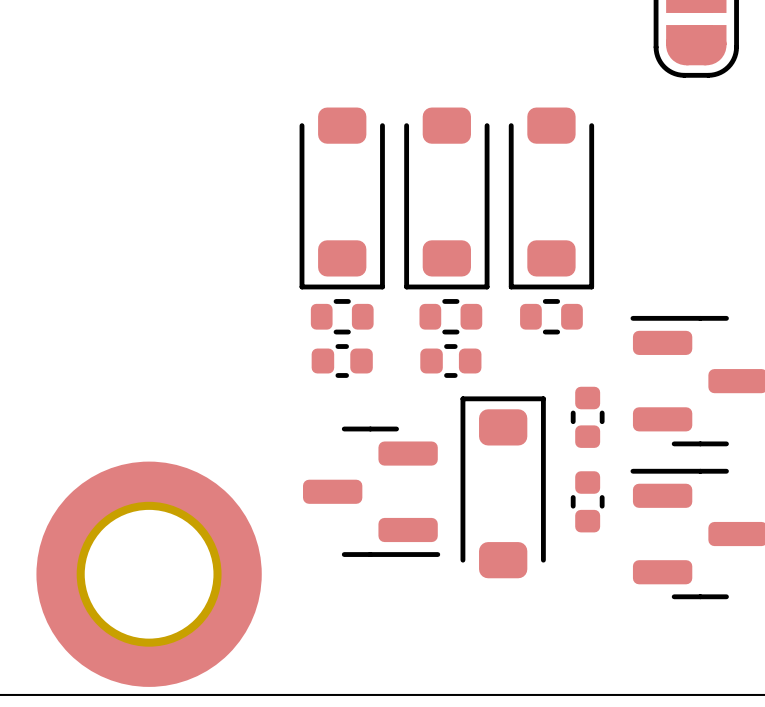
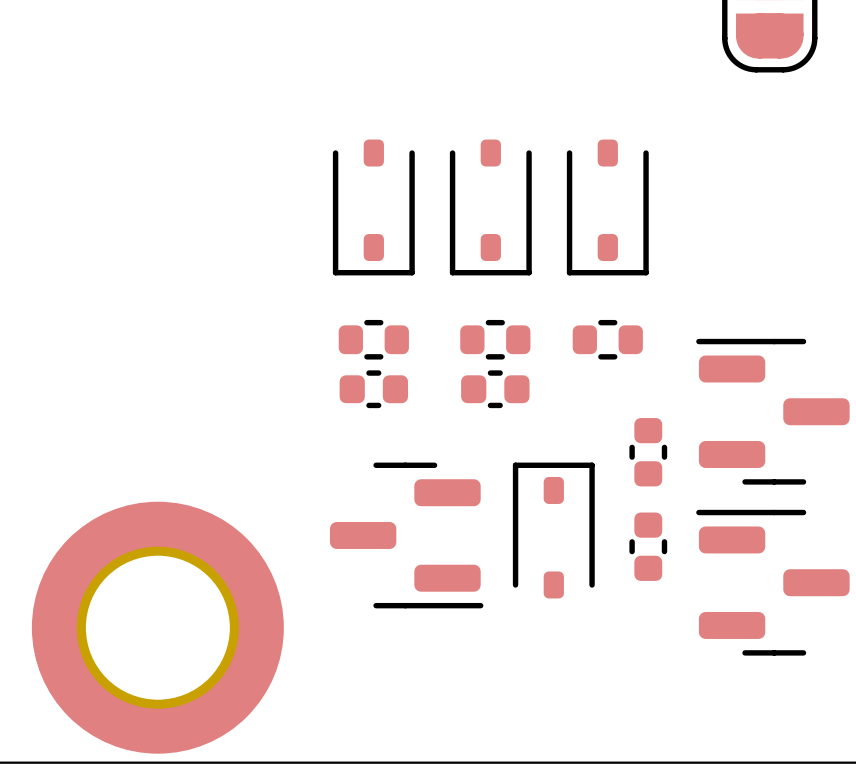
part footprint: [299, 107, 385, 290] -> [332, 139, 415, 276]
part footprint: [404, 107, 490, 290] -> [449, 139, 532, 276]
part footprint: [508, 107, 595, 290] -> [566, 139, 649, 276]
part footprint: [460, 396, 546, 579] -> [512, 462, 595, 599]

